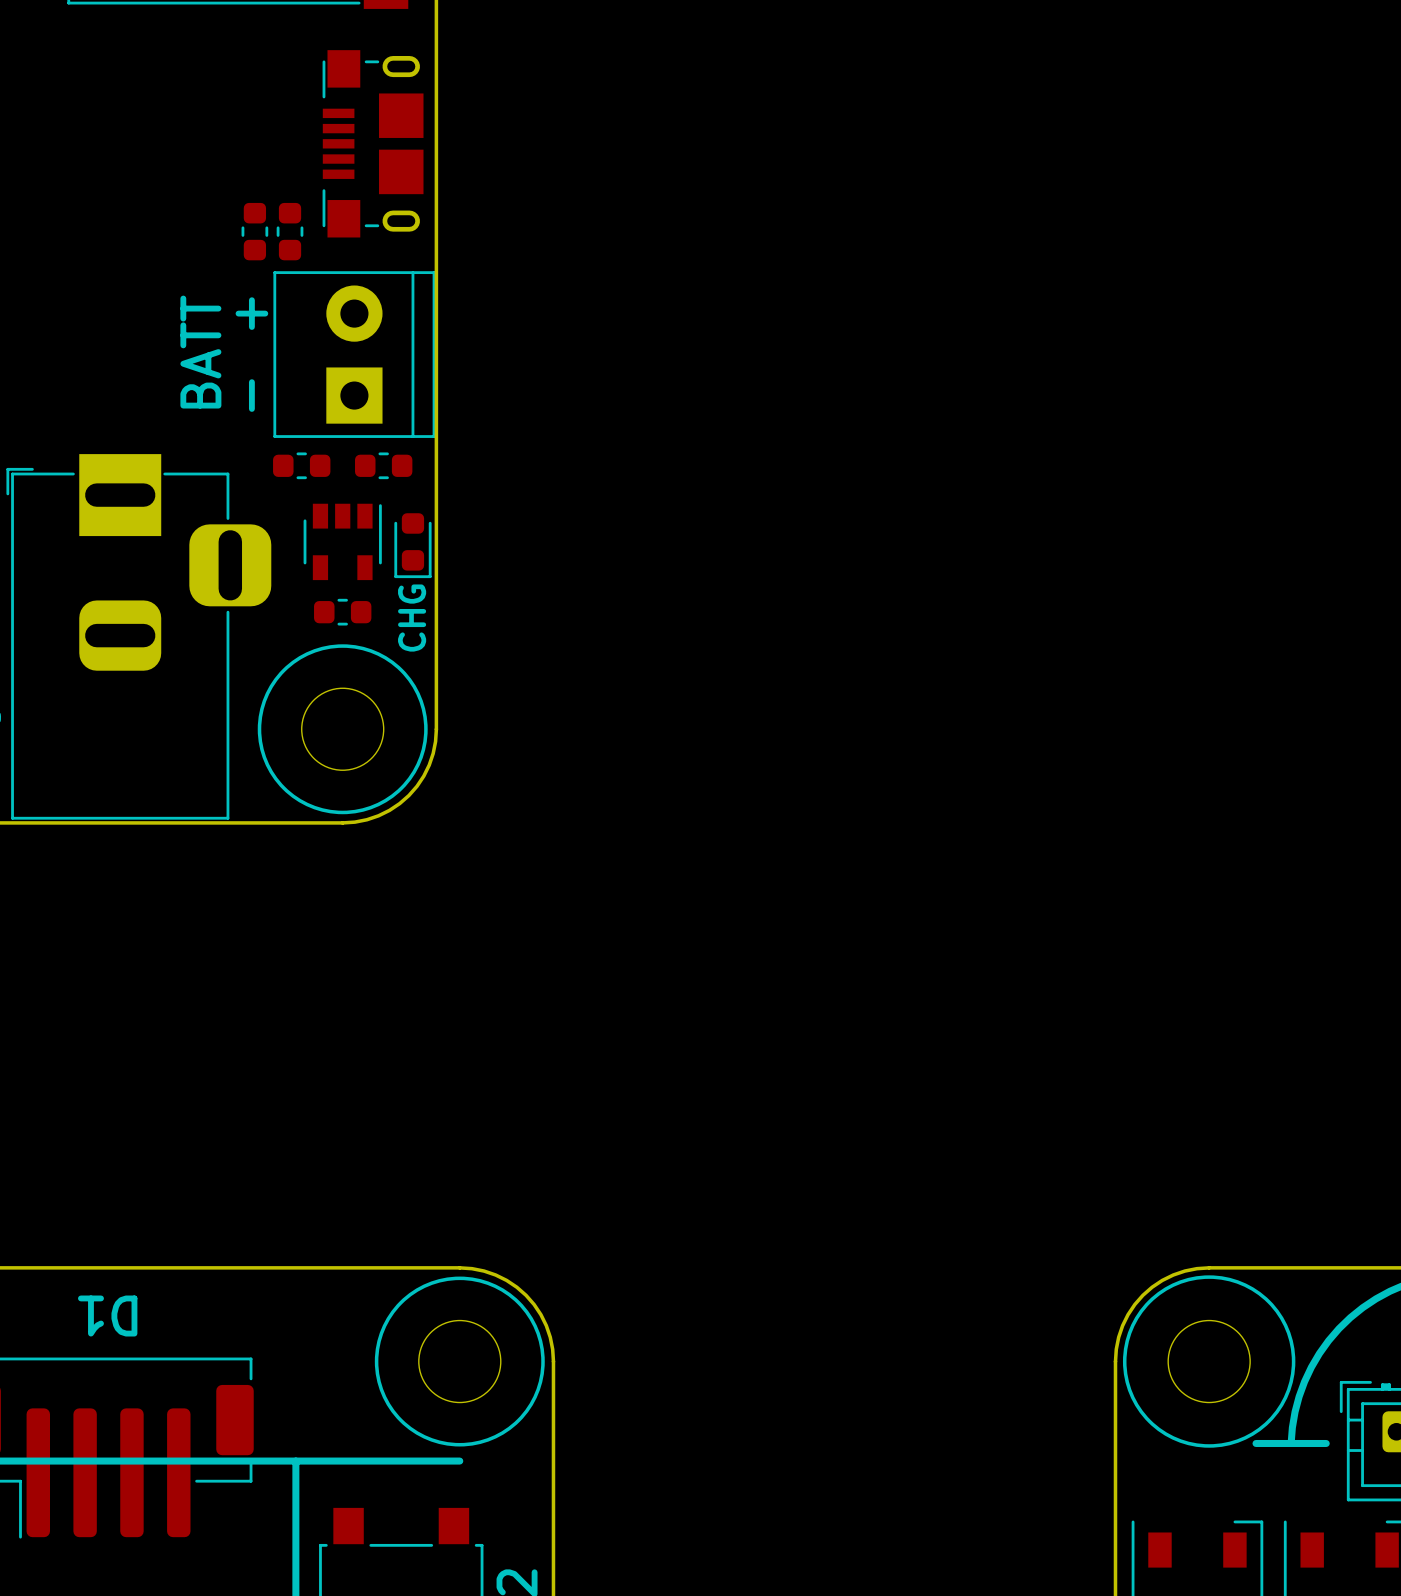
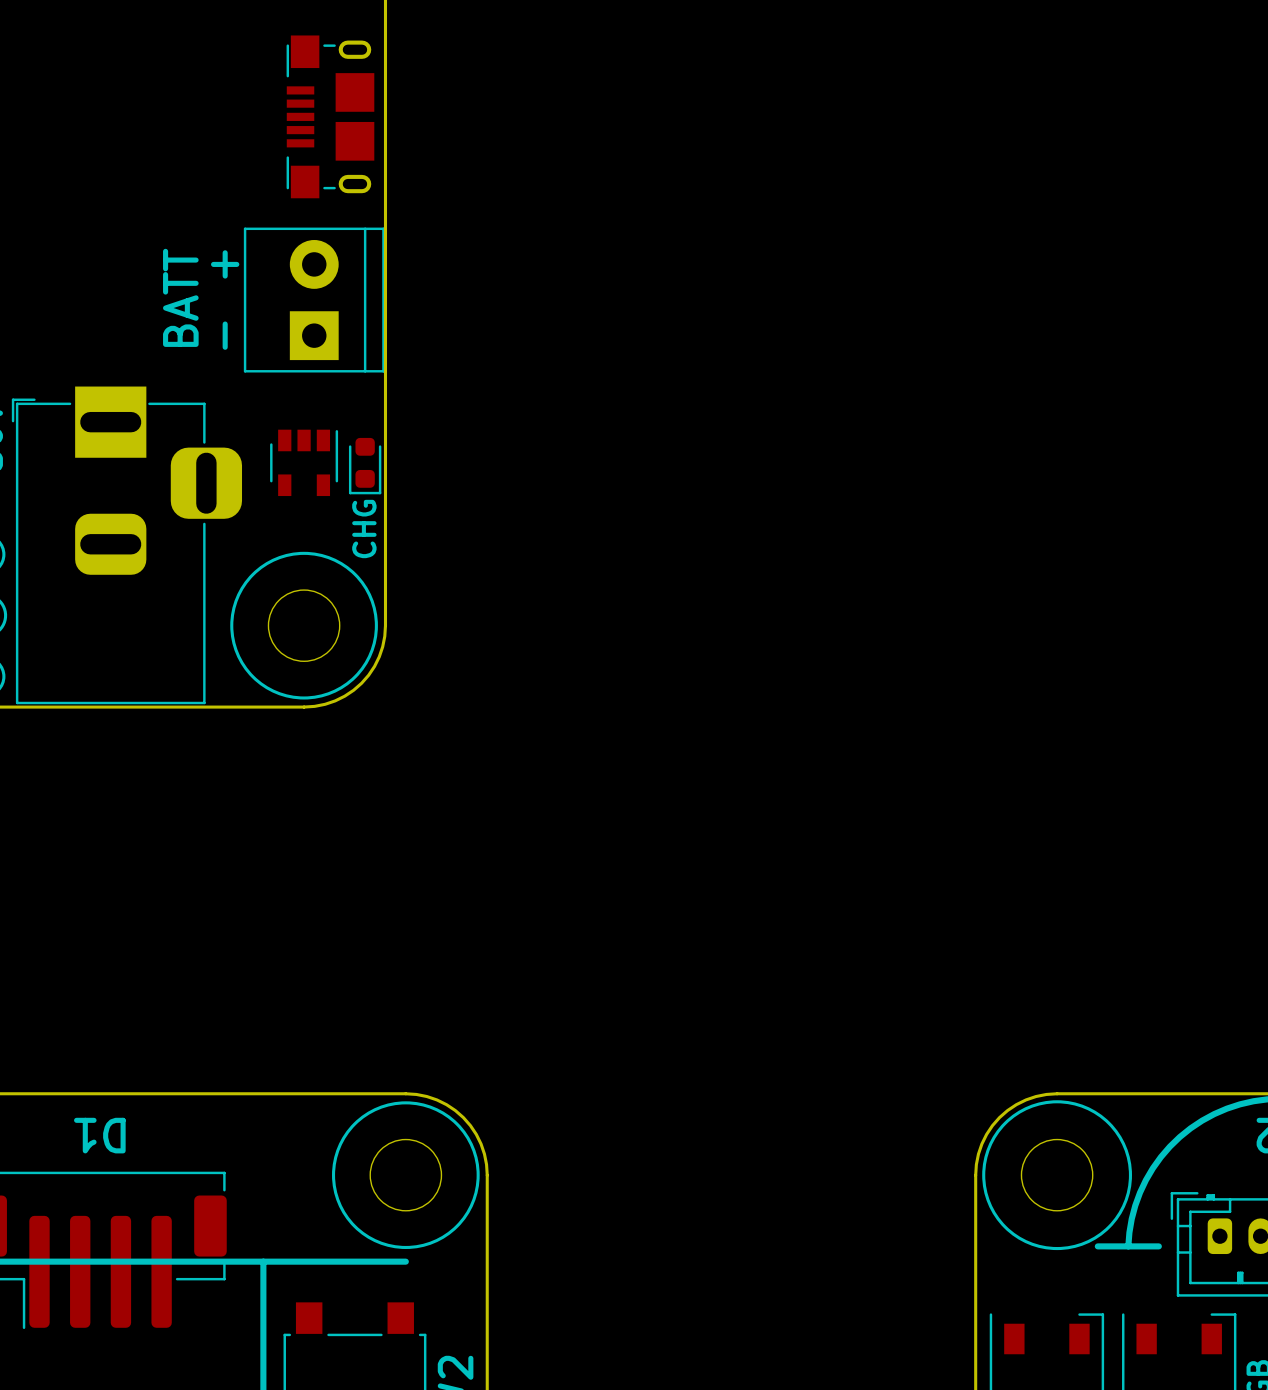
part: (254, 231) -> none
part: (290, 231) -> none
part: (301, 465) -> none
part: (383, 465) -> none
part: (342, 612) -> none

